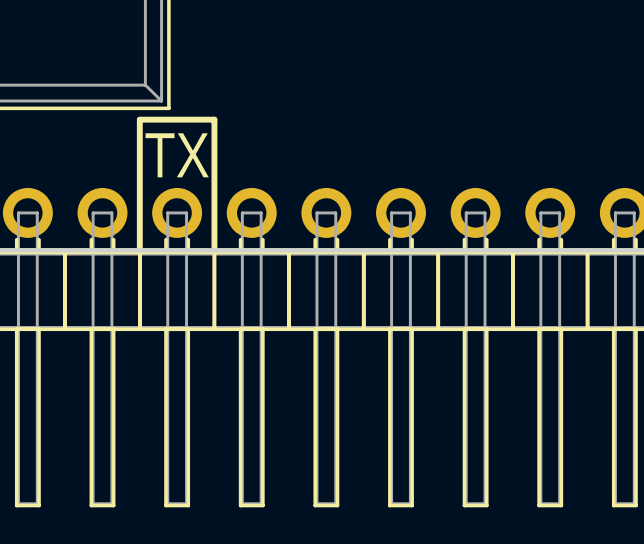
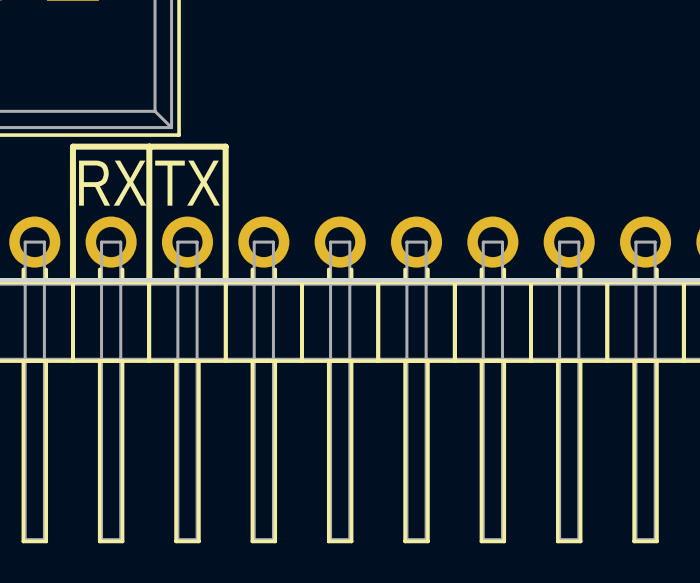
line: none -> (149, 146) (72, 146) (72, 280)
text: none -> RX (112, 183)

